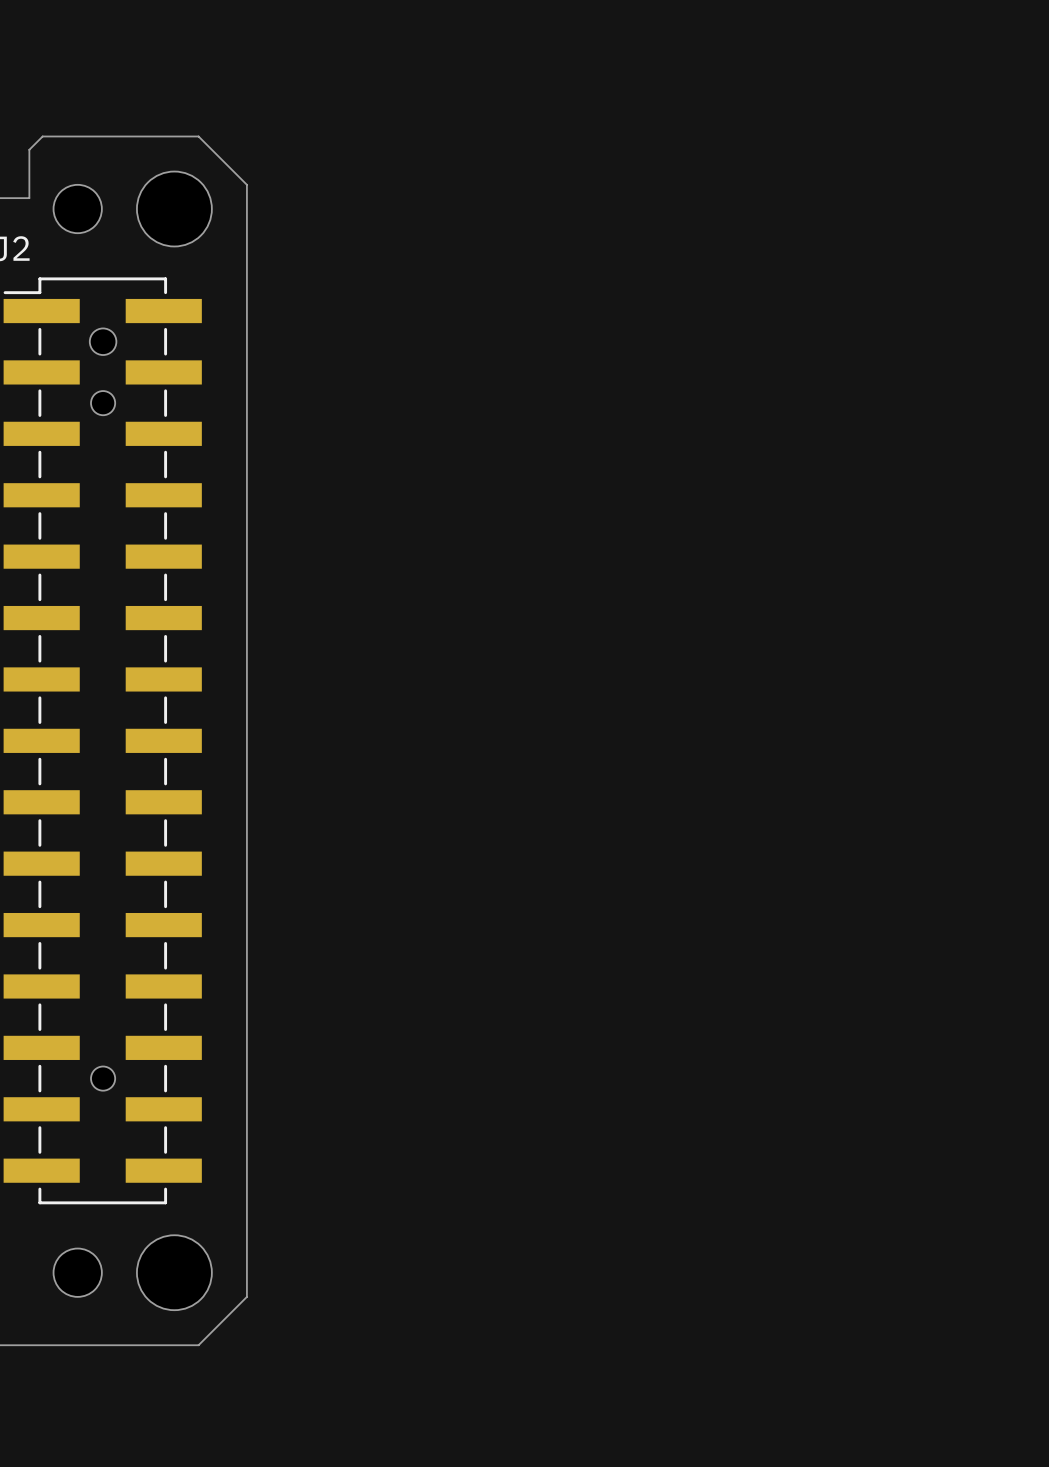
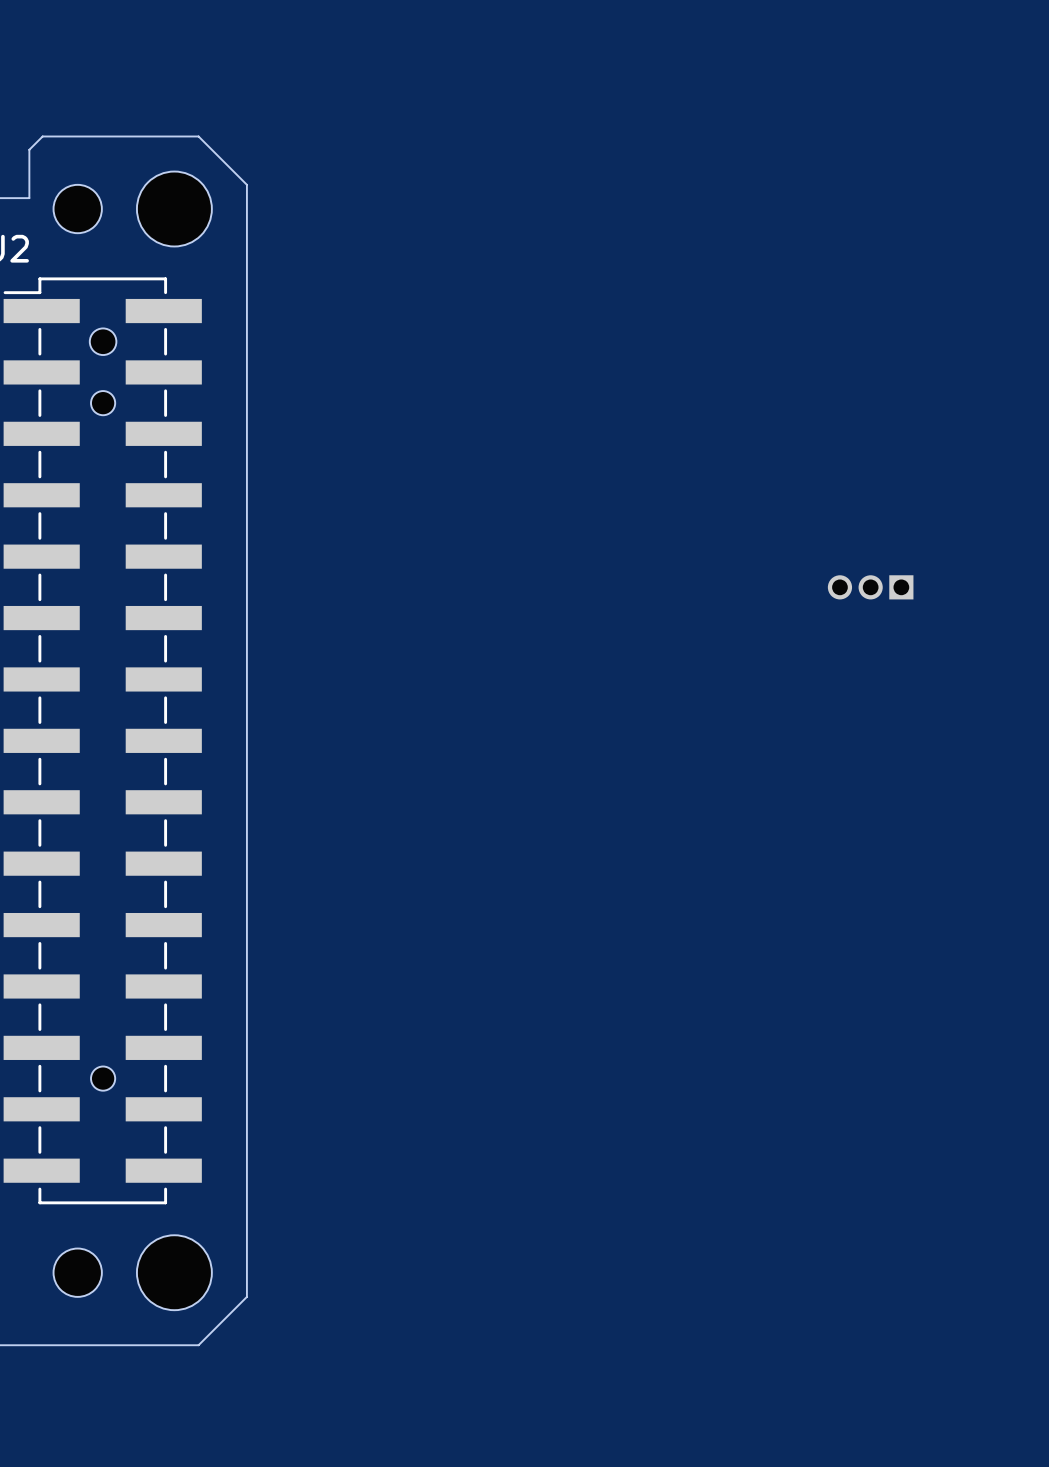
part: none -> (870, 587)

